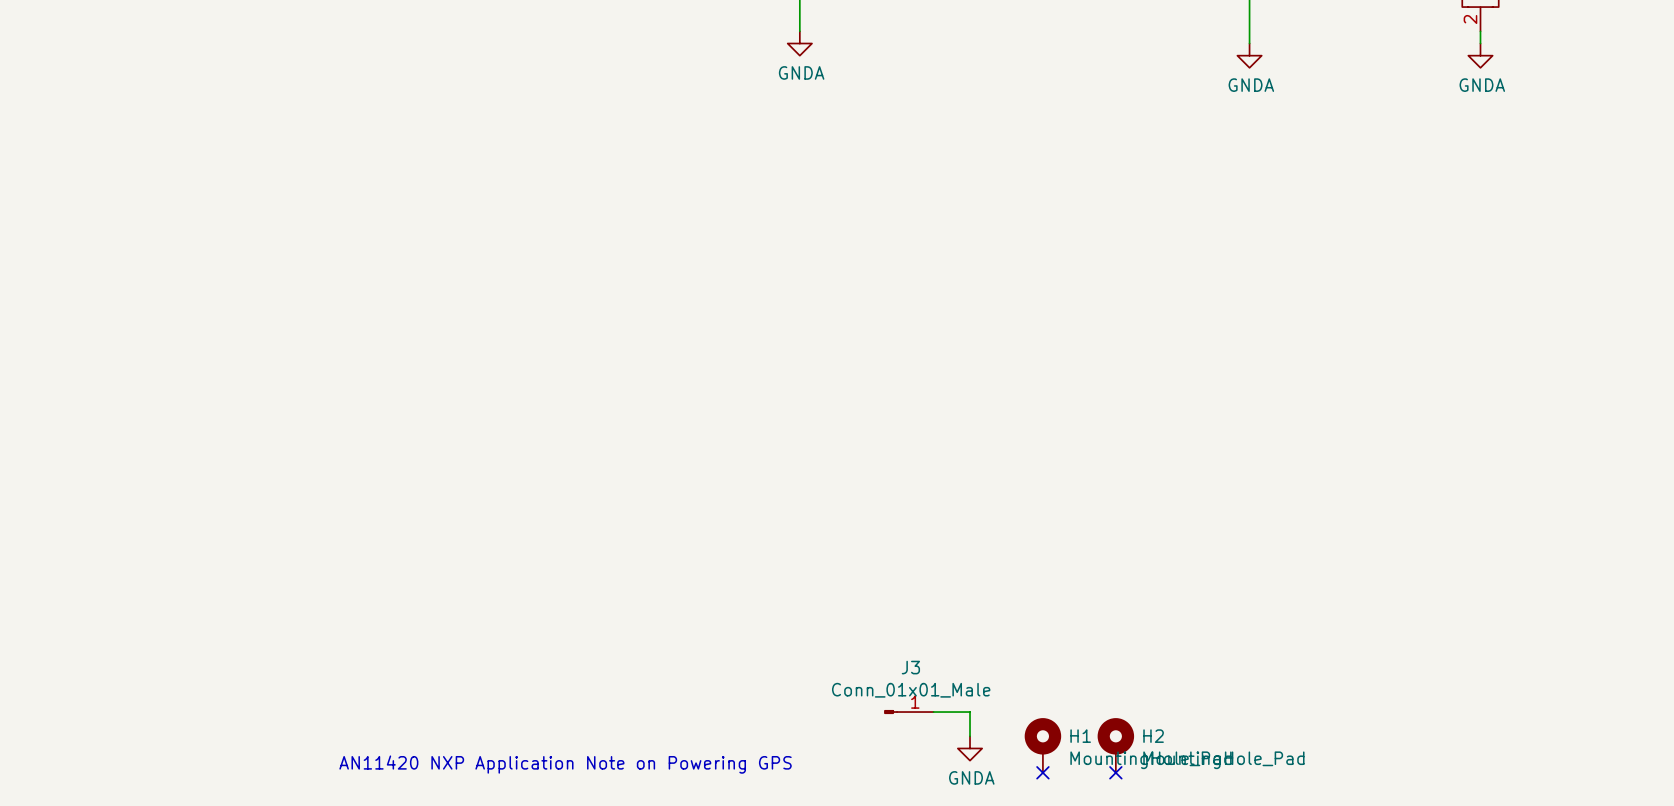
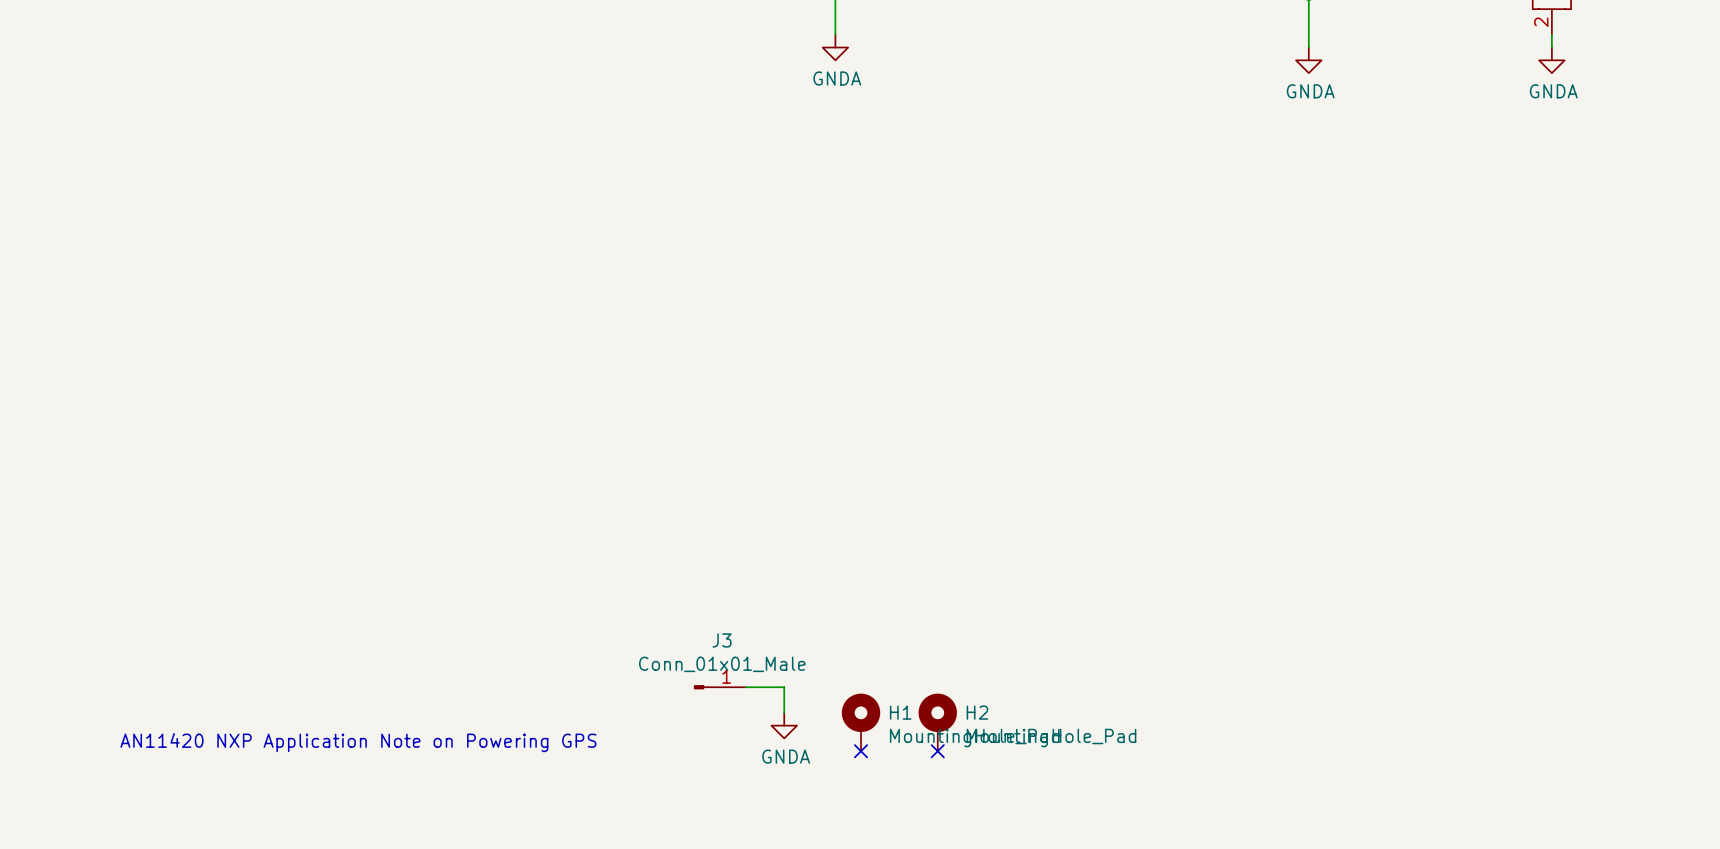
no-connect mark: none -> (861, 751)
no-connect mark: none -> (937, 751)
J3 position: (908, 712) -> (719, 687)
wire: (933, 712) (970, 712) (970, 736) -> (745, 687) (784, 687) (784, 712)
H1 position: (1042, 745) -> (861, 722)
H2 position: (1115, 745) -> (937, 722)
power symbol position: GNDA (970, 748) -> GNDA (784, 725)
text position: AN11420 NXP Application Note on Powering GPS (565, 764) -> AN11420 NXP Application Note on Powering GPS (358, 742)
no-connect mark: (1042, 772) -> none
no-connect mark: (1115, 772) -> none

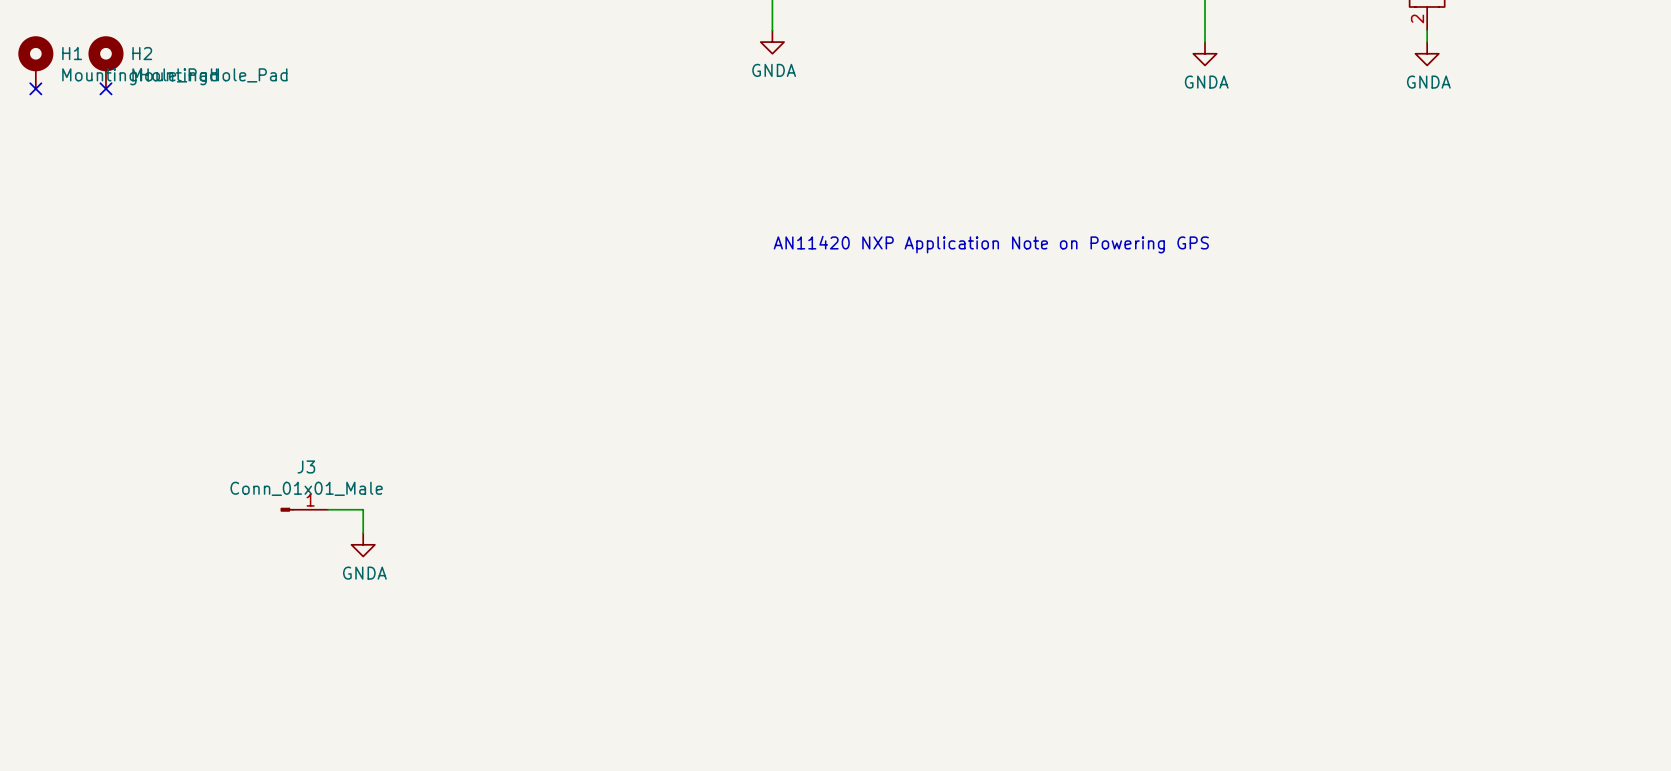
no-connect mark: none -> (35, 88)
no-connect mark: none -> (105, 88)
text: none -> AN11420 NXP Application Note on Powering GPS (991, 244)
wire: none -> (328, 509) (363, 509) (363, 533)
power symbol: none -> GNDA (363, 544)
J3 position: (719, 687) -> (304, 509)
wire: (745, 687) (784, 687) (784, 712) -> none
H1 position: (861, 722) -> (35, 62)
H2 position: (937, 722) -> (105, 62)
power symbol: GNDA (784, 725) -> none
text: AN11420 NXP Application Note on Powering GPS (358, 742) -> none
no-connect mark: (861, 751) -> none
no-connect mark: (937, 751) -> none

